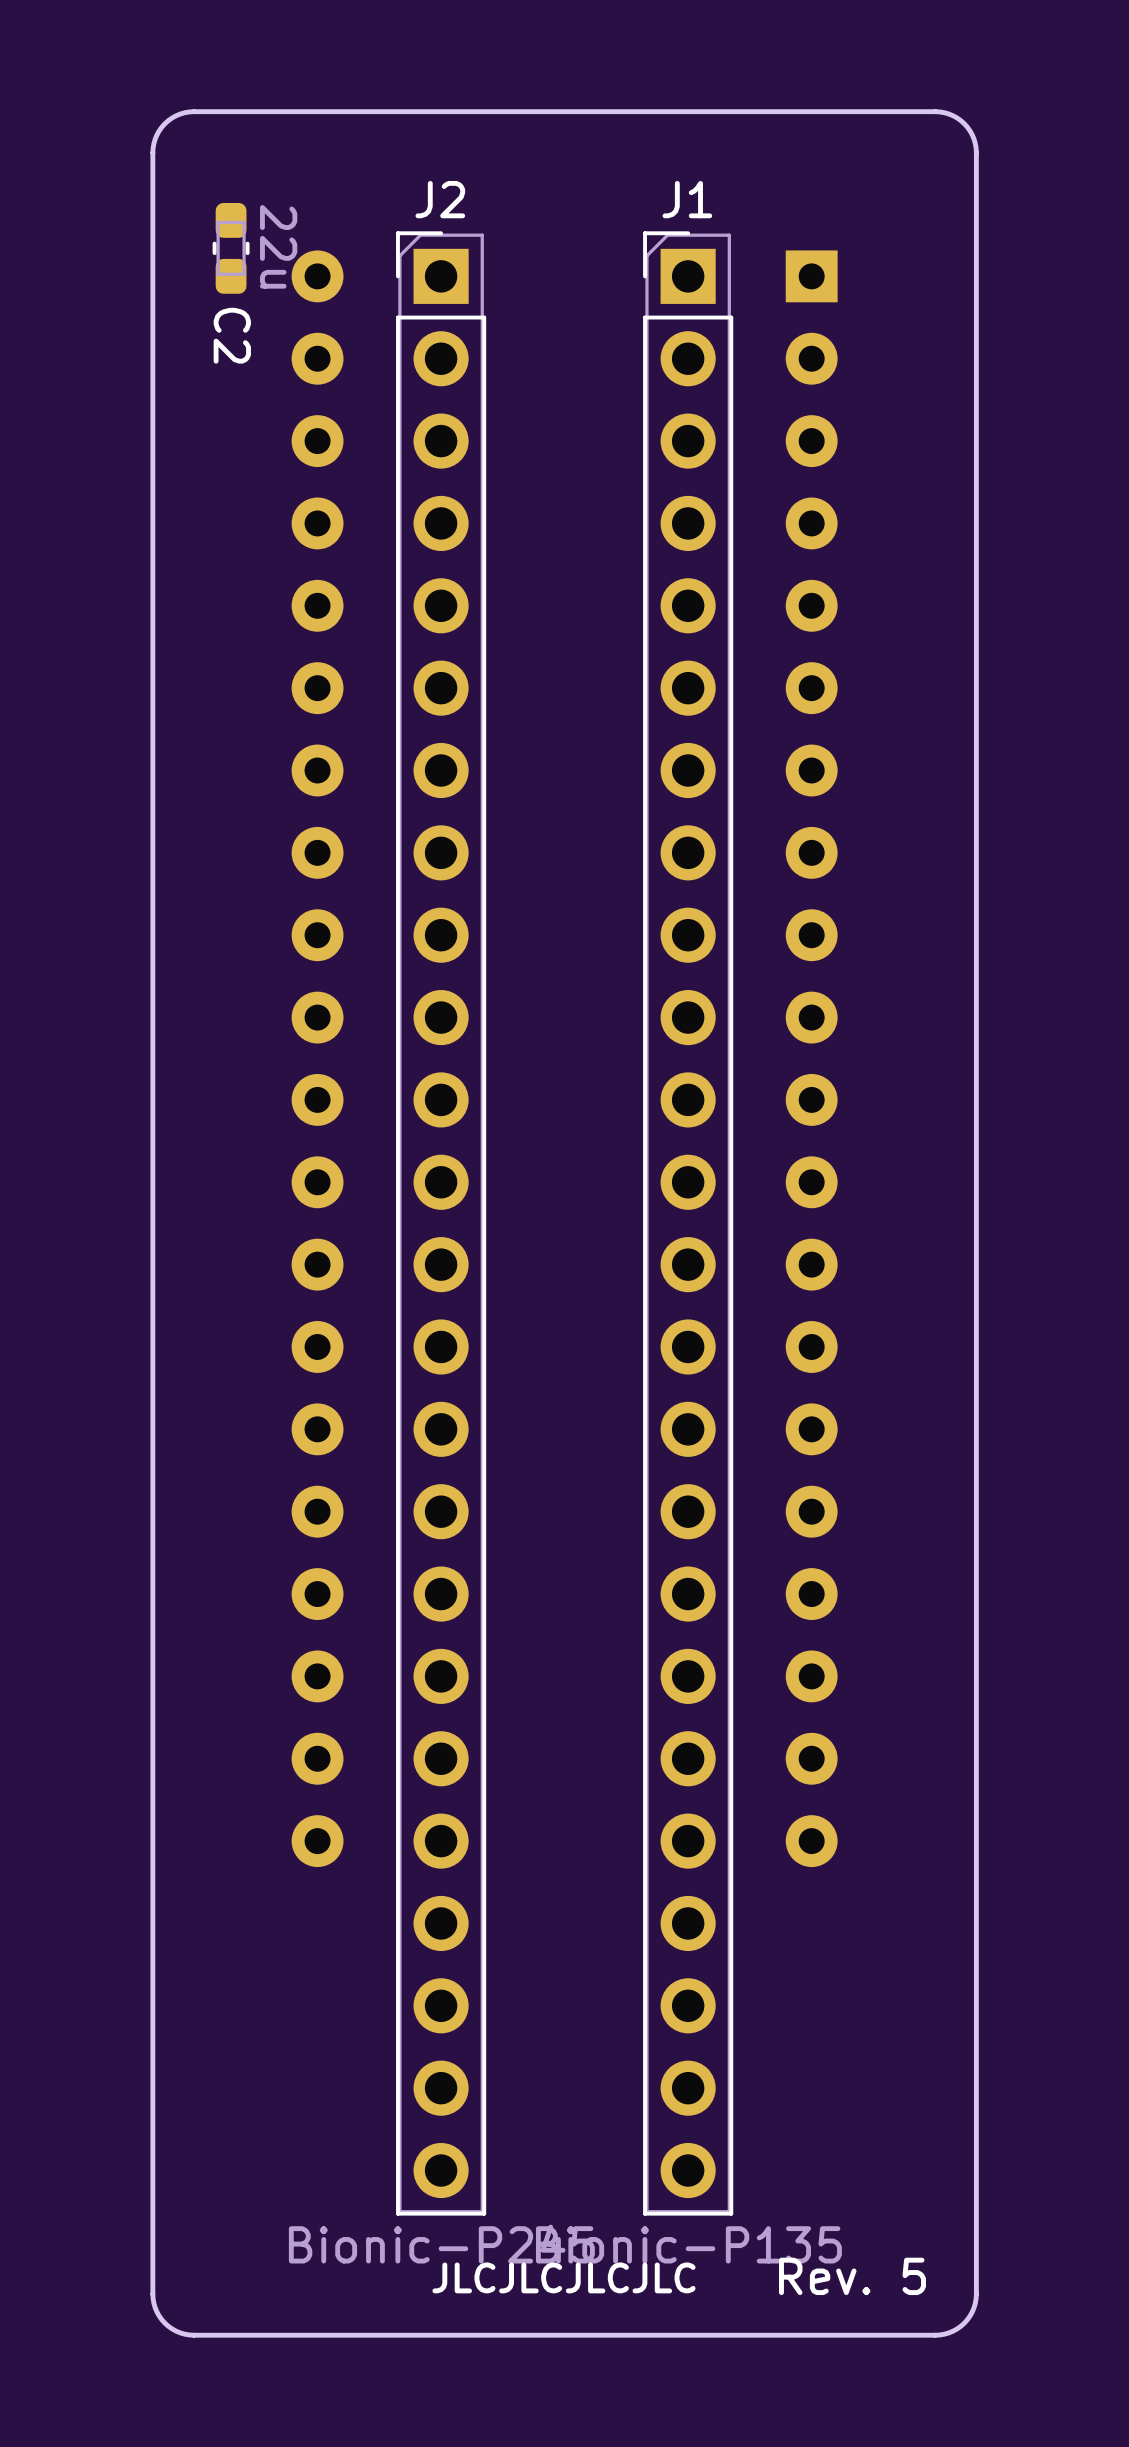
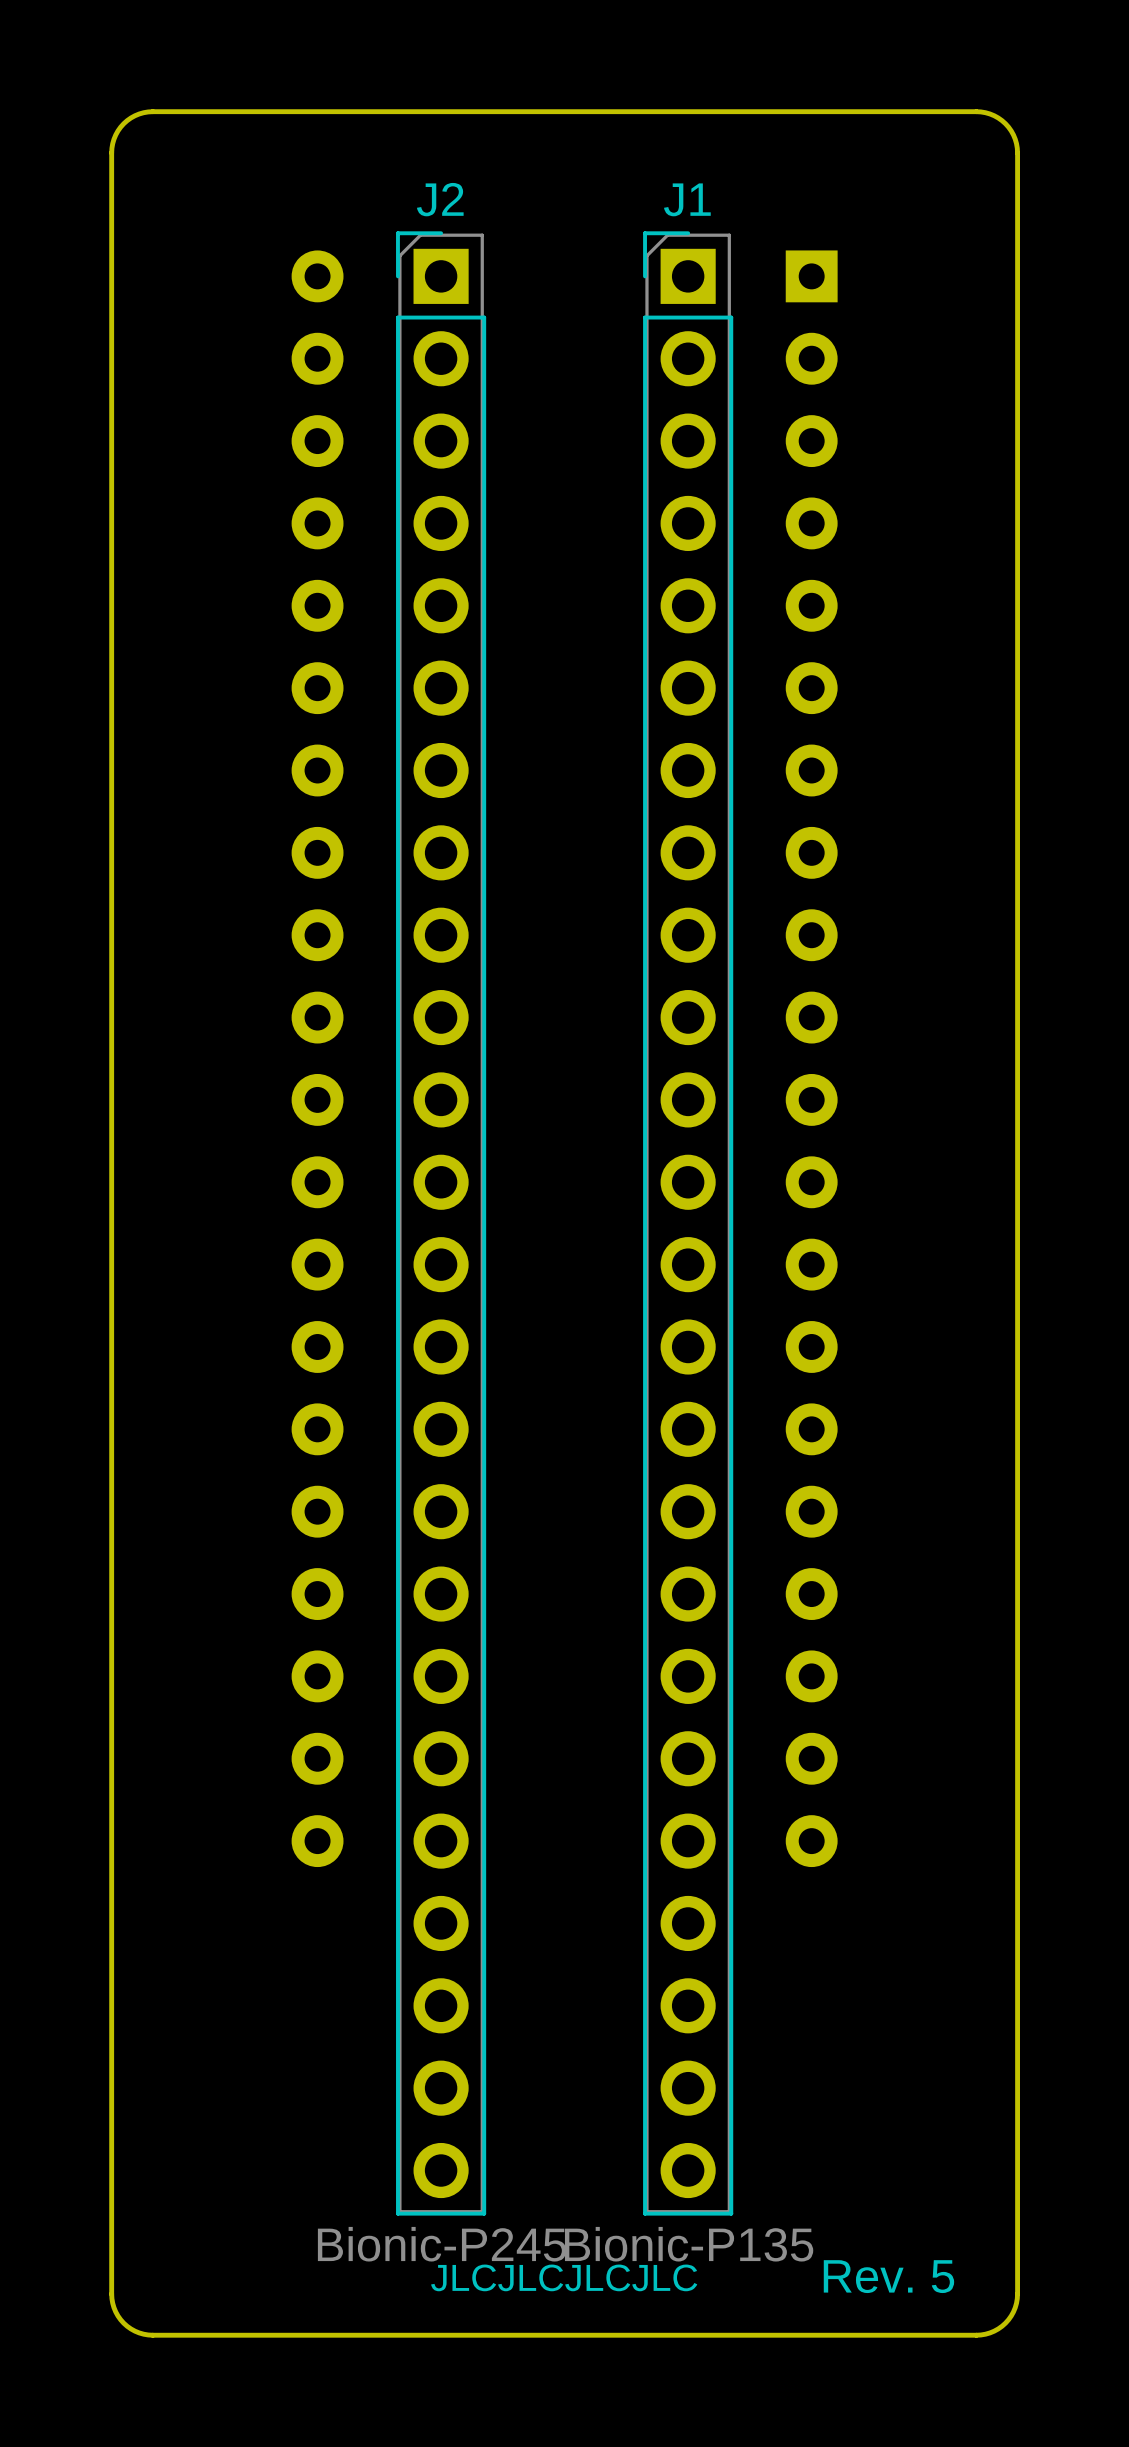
board edge: (194, 111) (180, 113) (164, 123) (155, 139) (152, 152) (152, 2294) (155, 2307) (164, 2323) (180, 2332) (194, 2335) -> (194, 111) (148, 111) (134, 115) (127, 120) (117, 130) (112, 143) (111, 152) (111, 2294) (112, 2303) (117, 2315) (127, 2326) (134, 2331) (148, 2334) (194, 2335)
board edge: (935, 111) (948, 113) (964, 123) (974, 139) (976, 152) (976, 2294) (974, 2307) (964, 2323) (948, 2332) (935, 2335) -> (935, 111) (981, 111) (994, 115) (1002, 120) (1011, 130) (1016, 143) (1017, 152) (1017, 2294) (1016, 2303) (1011, 2315) (1005, 2323) (994, 2331) (981, 2334) (935, 2335)
C2: 22u (231, 248) -> none
text position: Rev. 5 (852, 2276) -> Rev. 5 (888, 2276)

